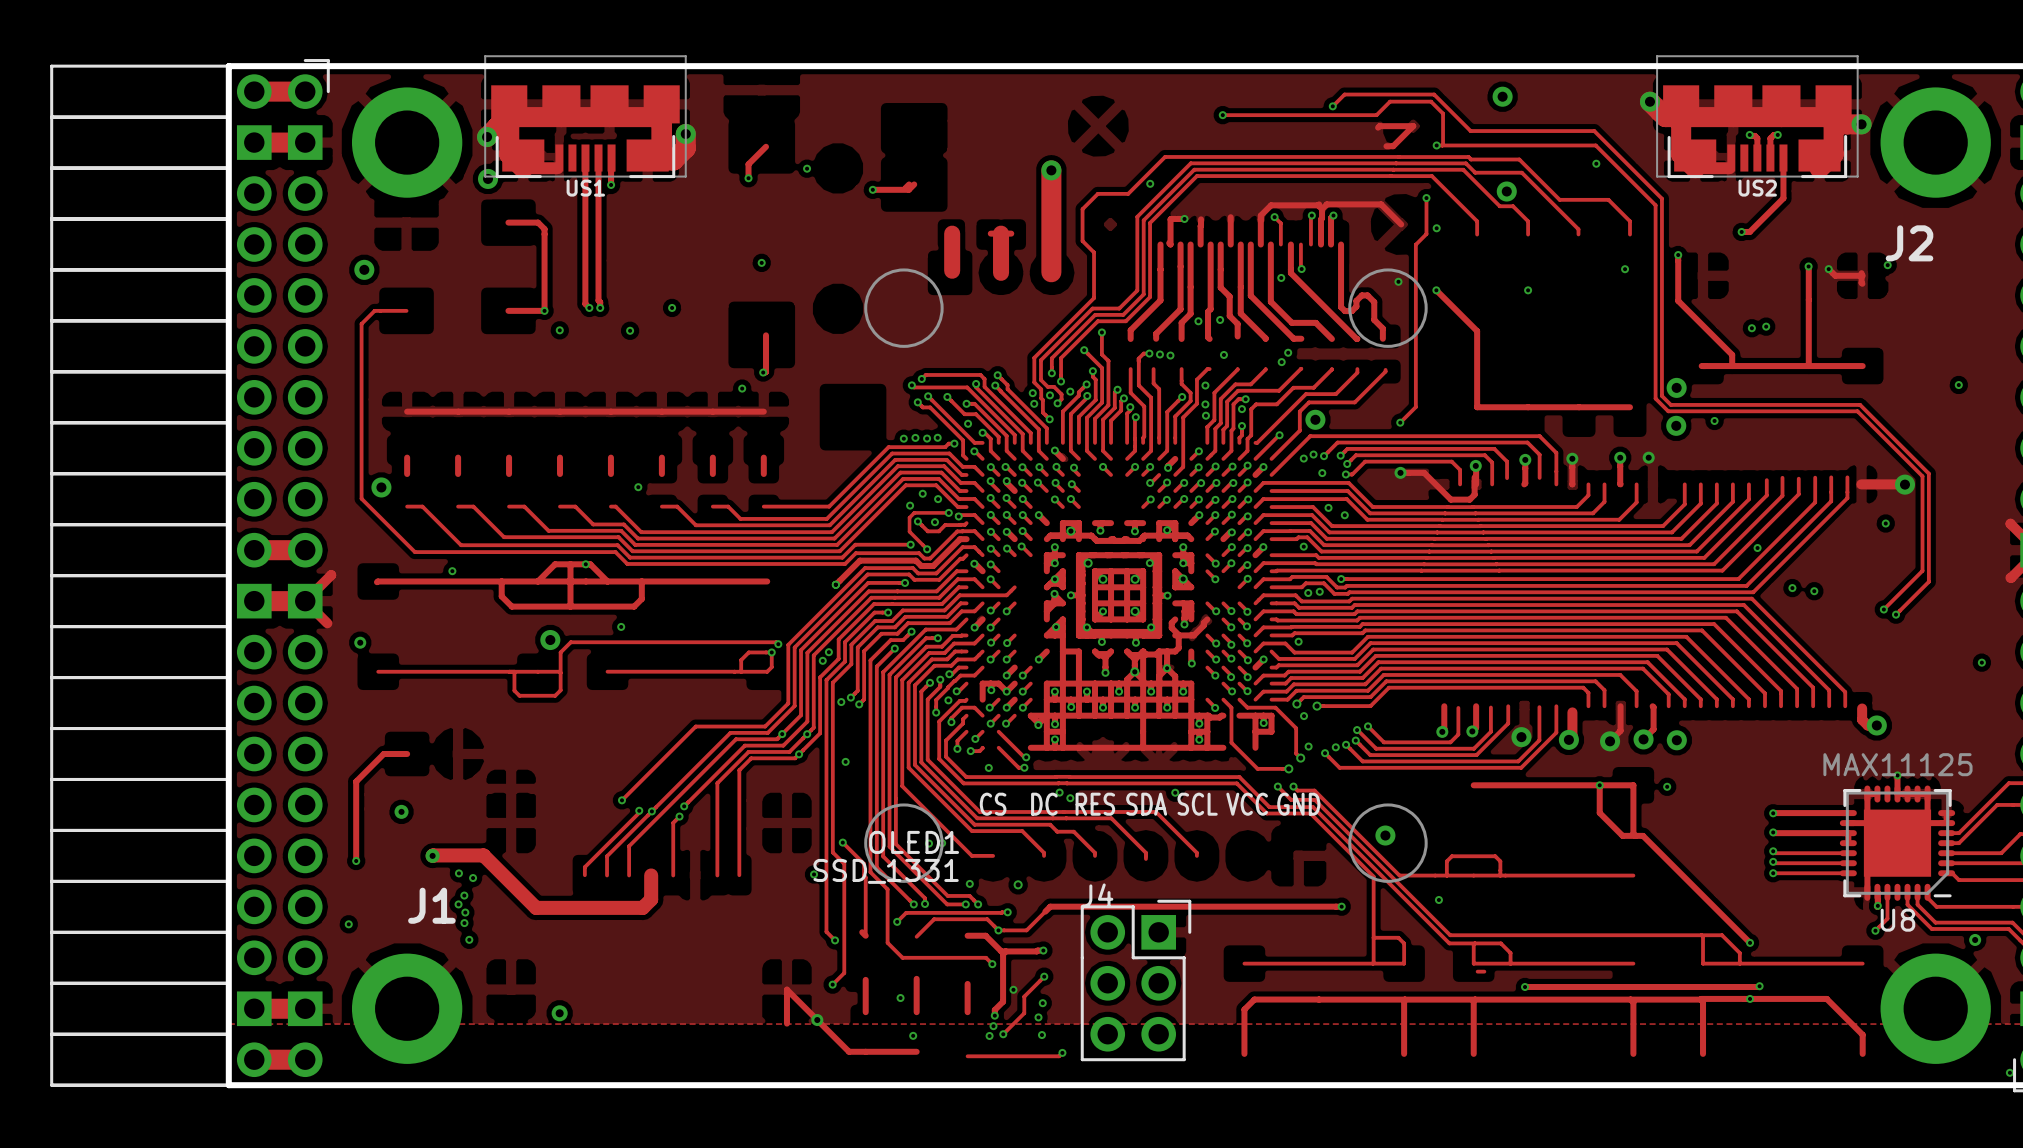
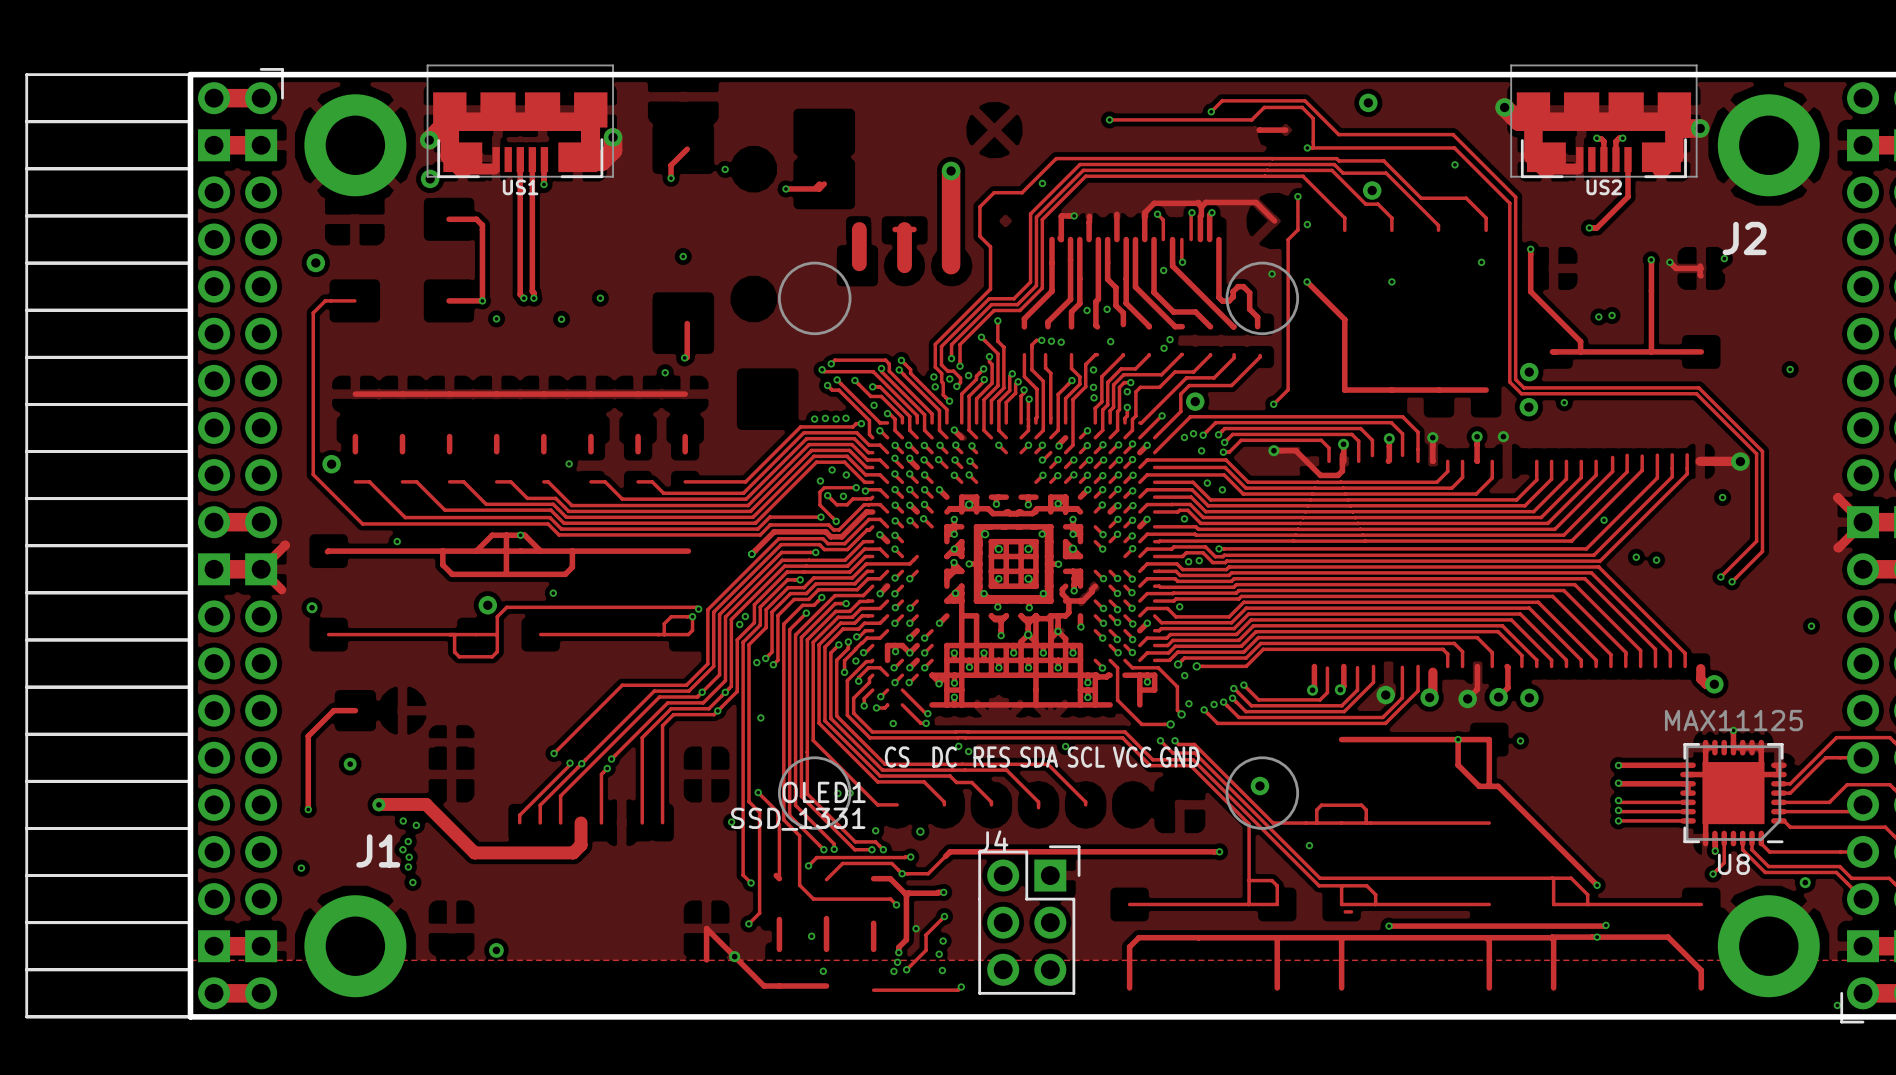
track: (1384, 126) (1378, 127) -> none
track: (1413, 126) (1393, 146) (1386, 146) -> none

